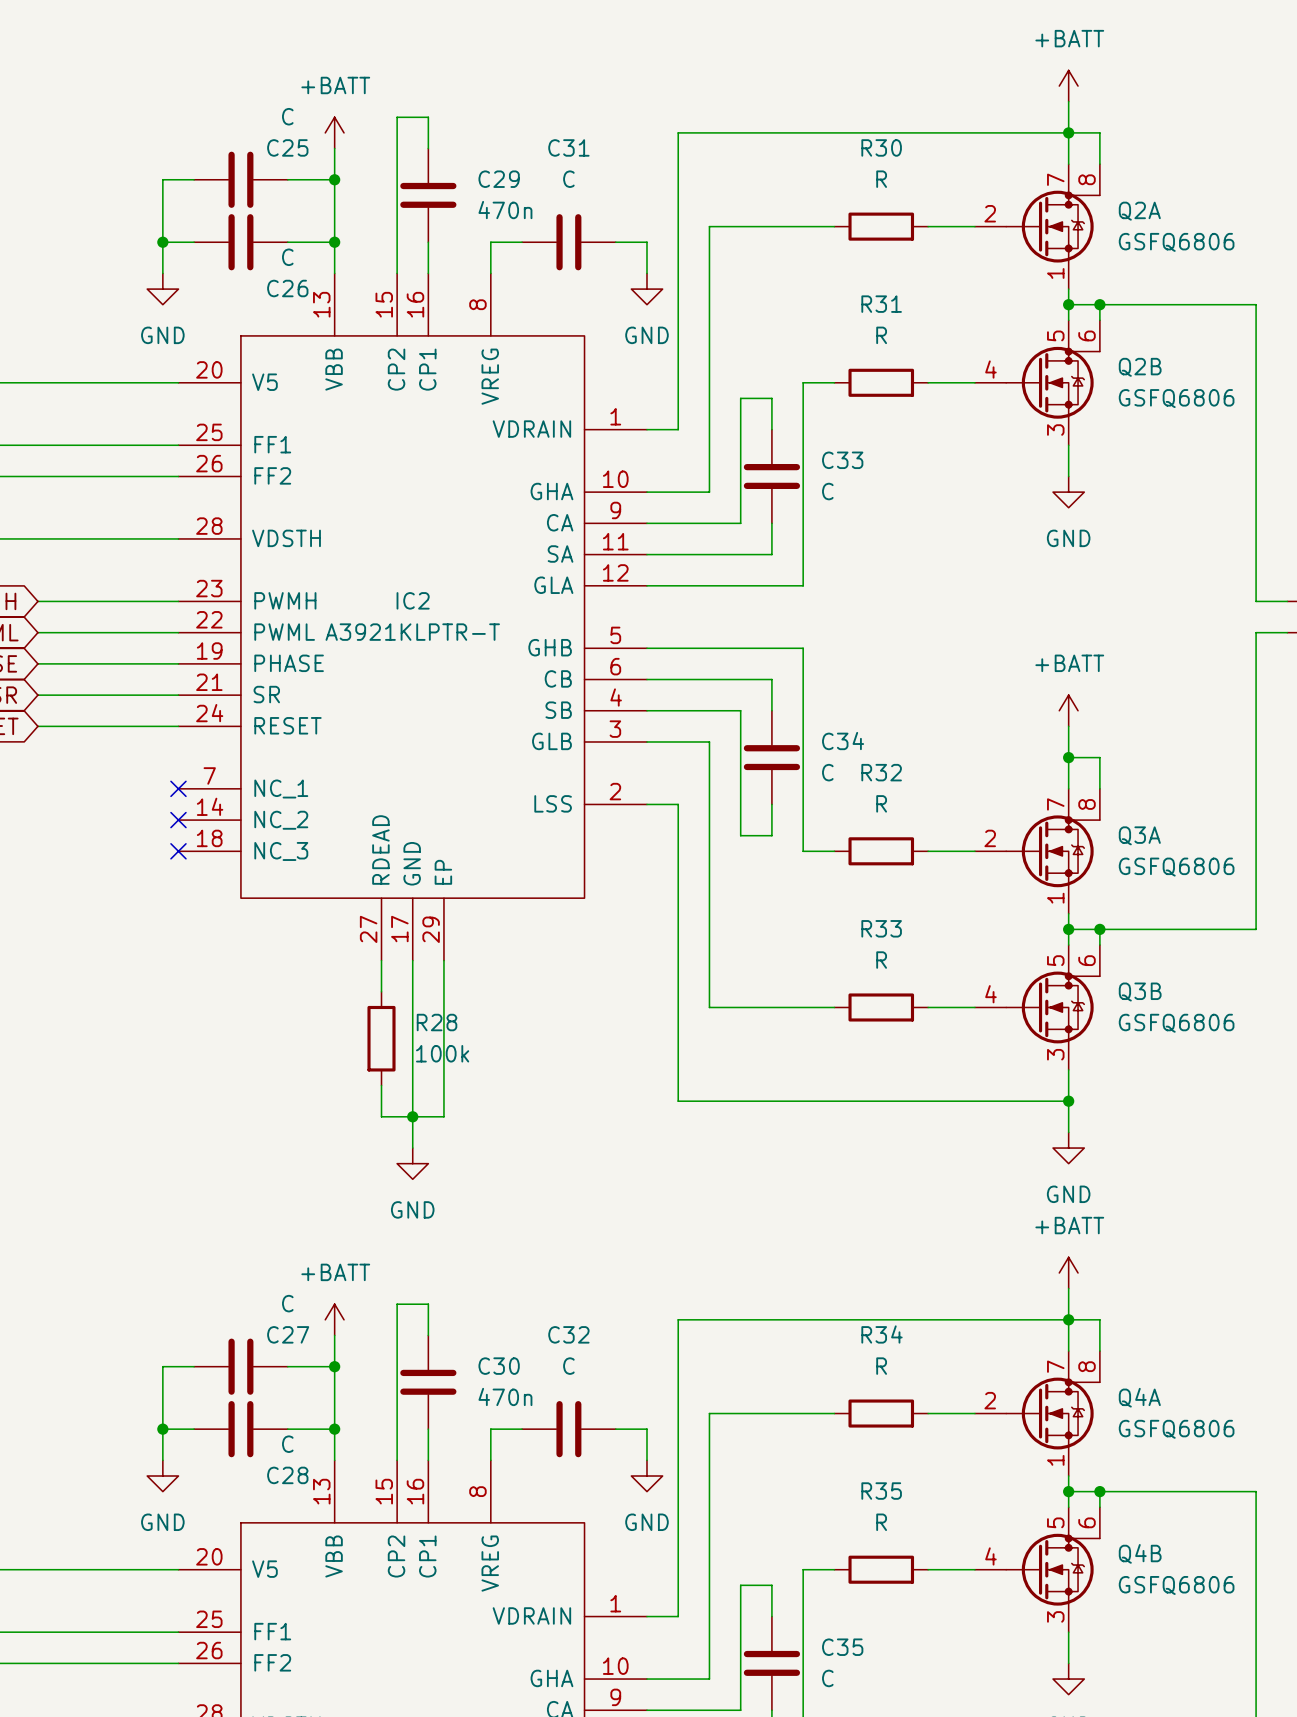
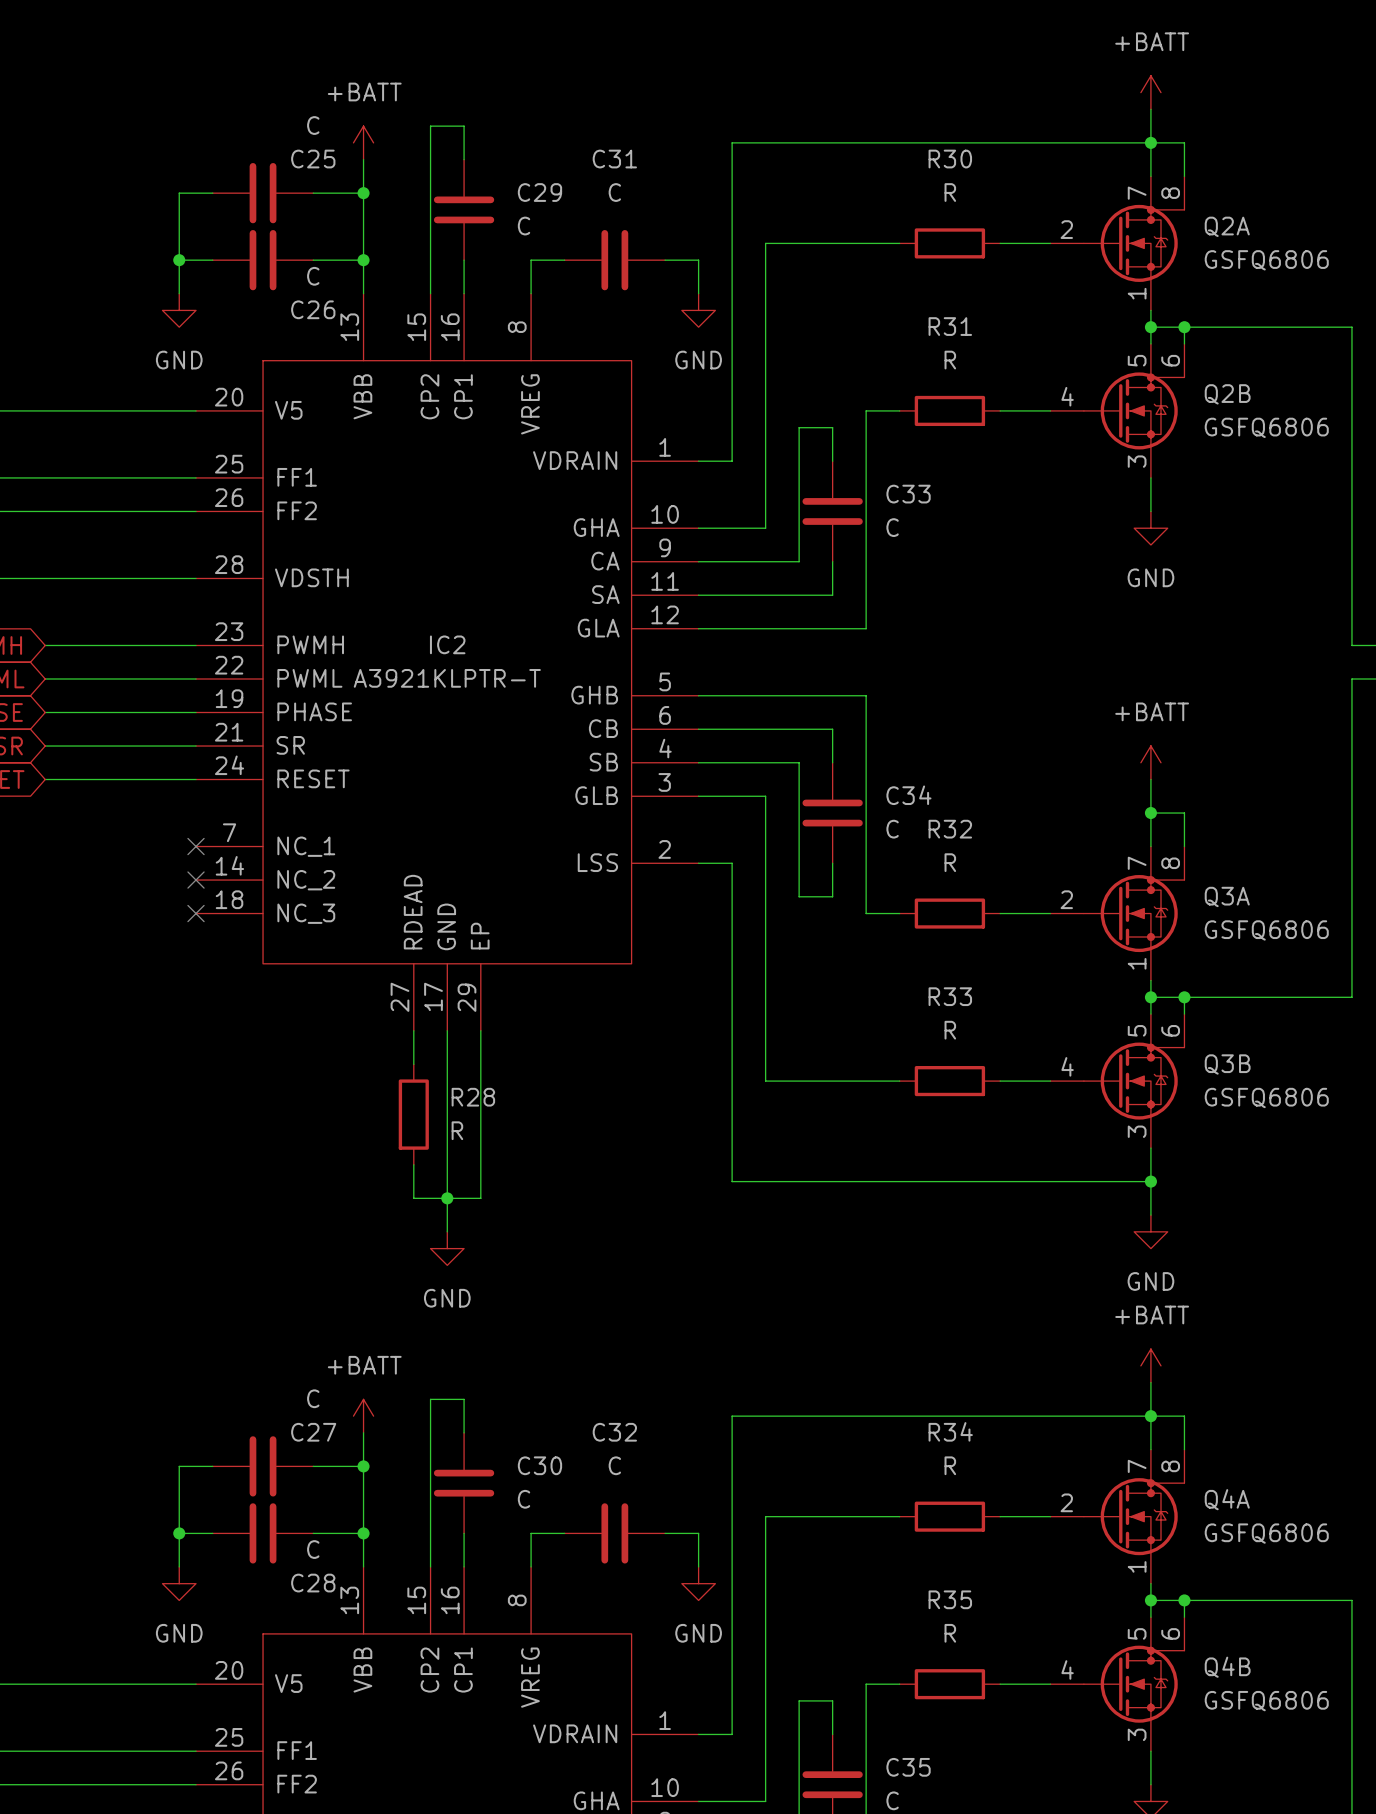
C29 value: 470n (505, 210) -> C (524, 226)
R28 value: 100k (442, 1053) -> R (457, 1130)
C30 value: 470n (505, 1396) -> C (524, 1499)

